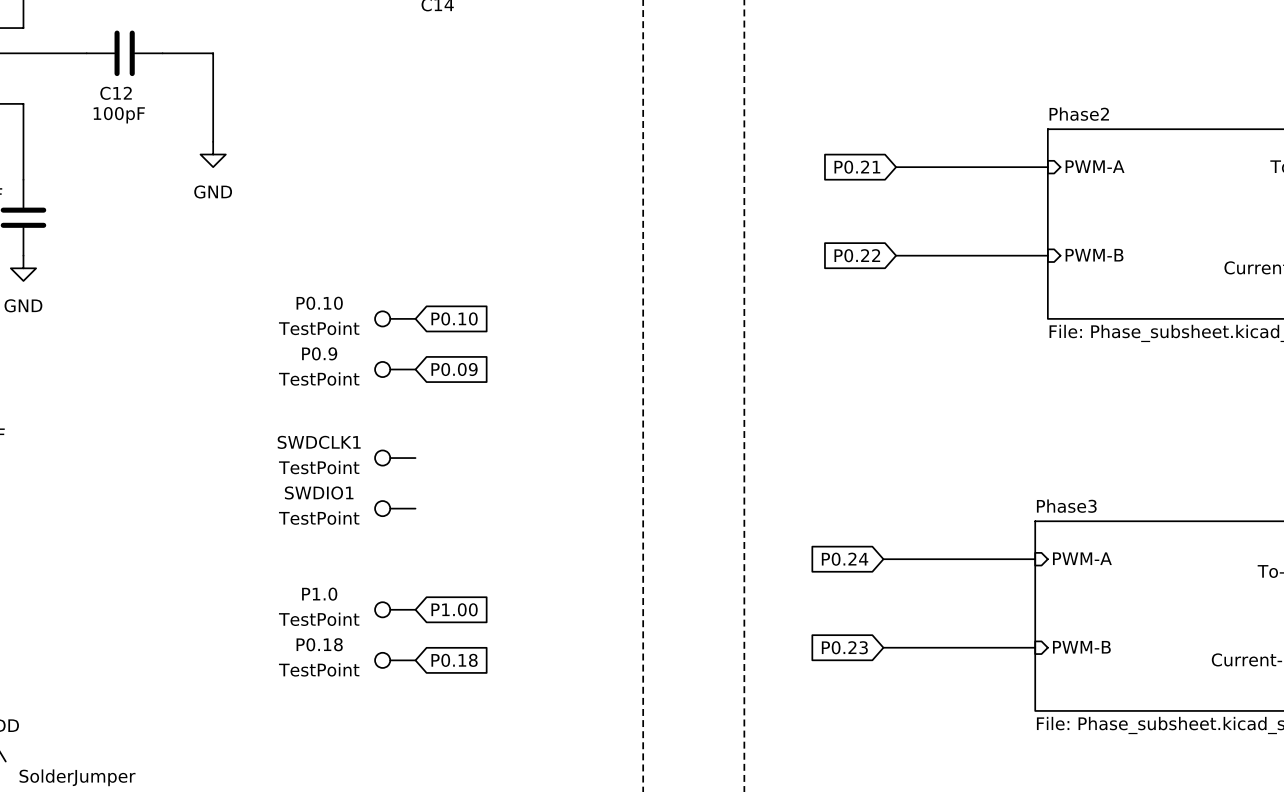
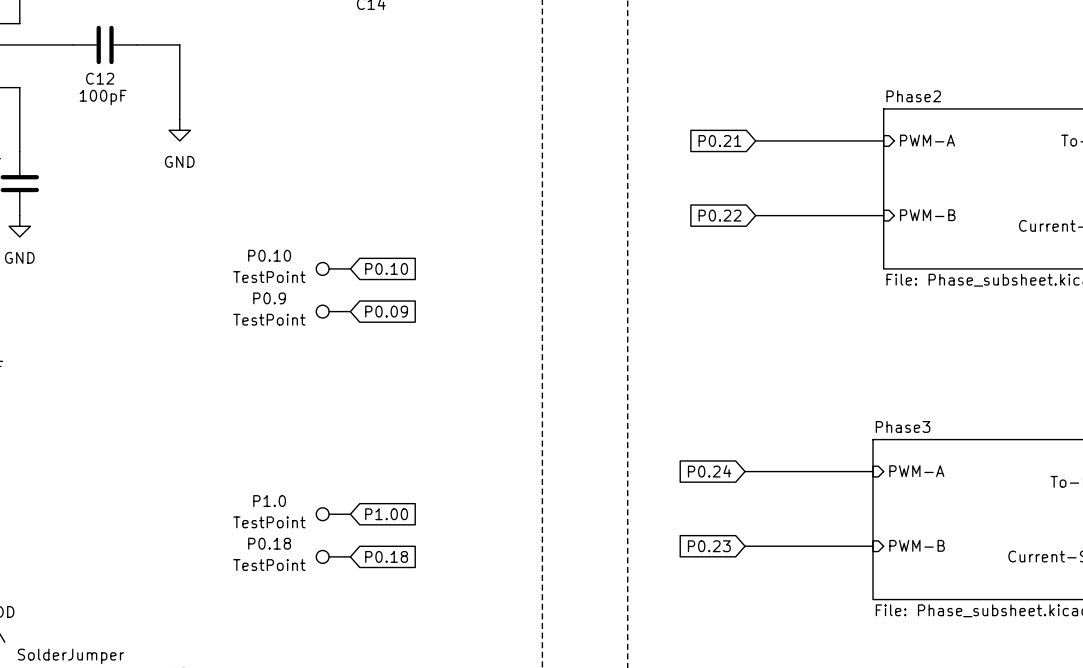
SWDCLK1: TestPoint (395, 458) -> none
SWDIO1: TestPoint (395, 508) -> none

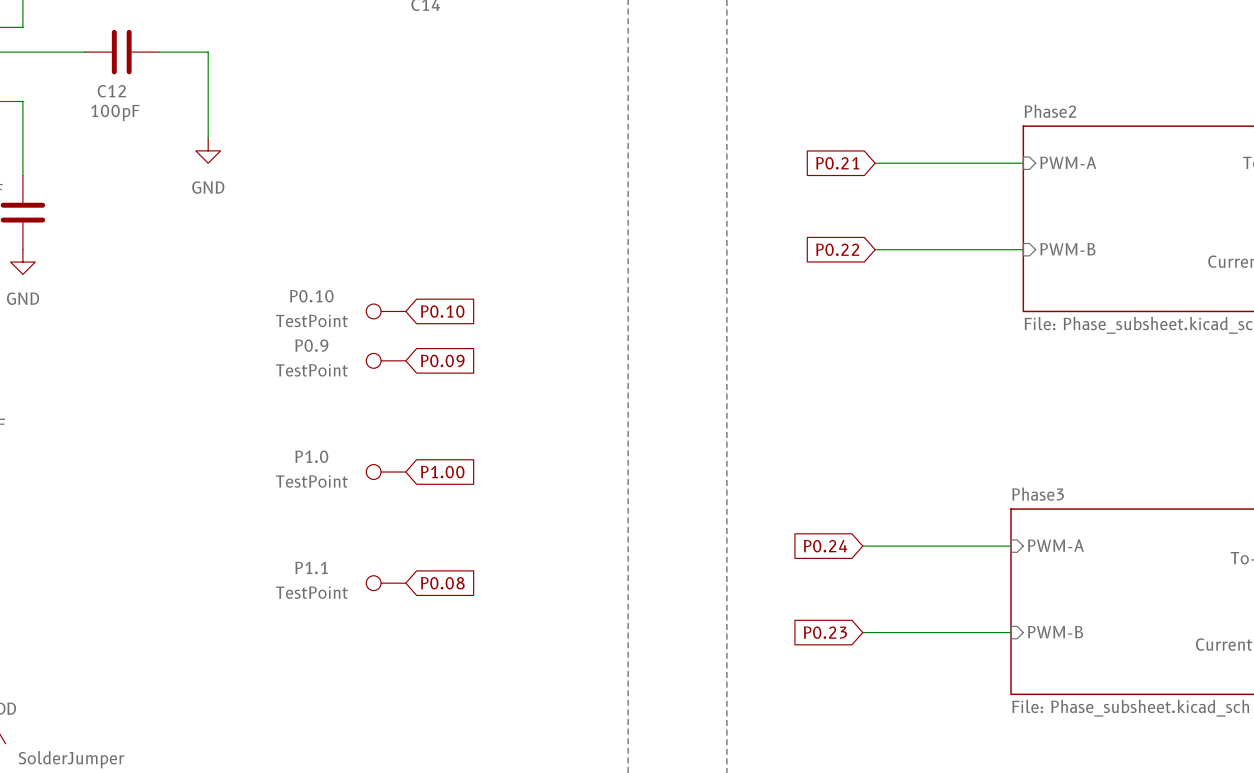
P1.1: none -> TestPoint (386, 583)
global label: none -> P0.08 (442, 583)
P1.0 position: (333, 514) -> (386, 472)
global label position: P1.00 (386, 514) -> P1.00 (442, 472)
P0.18: TestPoint (333, 556) -> none
global label: P0.18 (386, 556) -> none

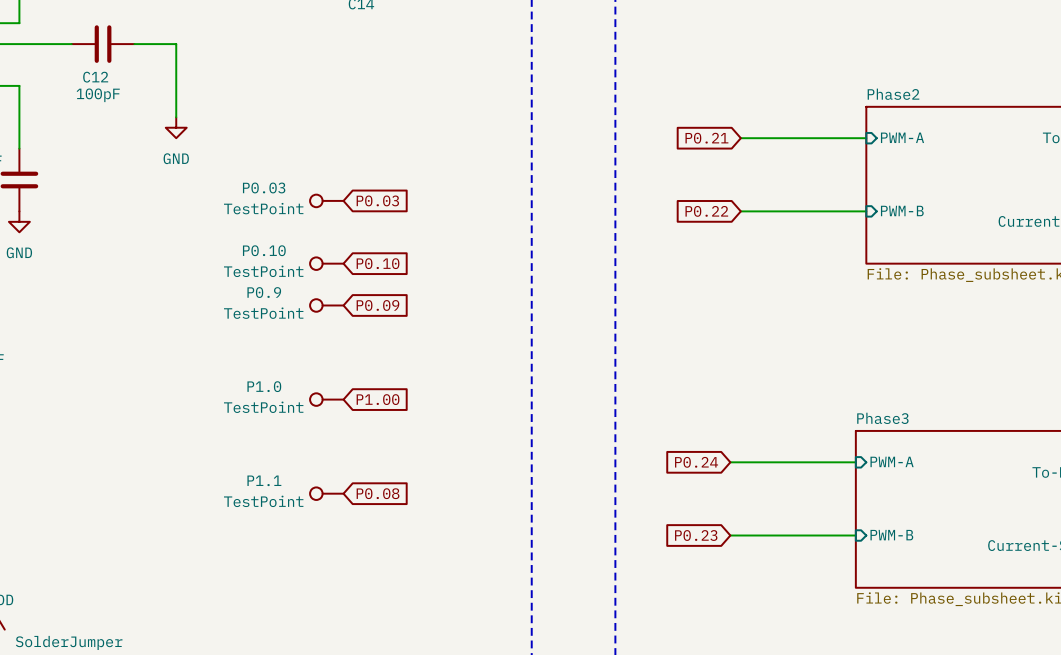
P0.03: none -> TestPoint (326, 200)
global label: none -> P0.03 (377, 200)

